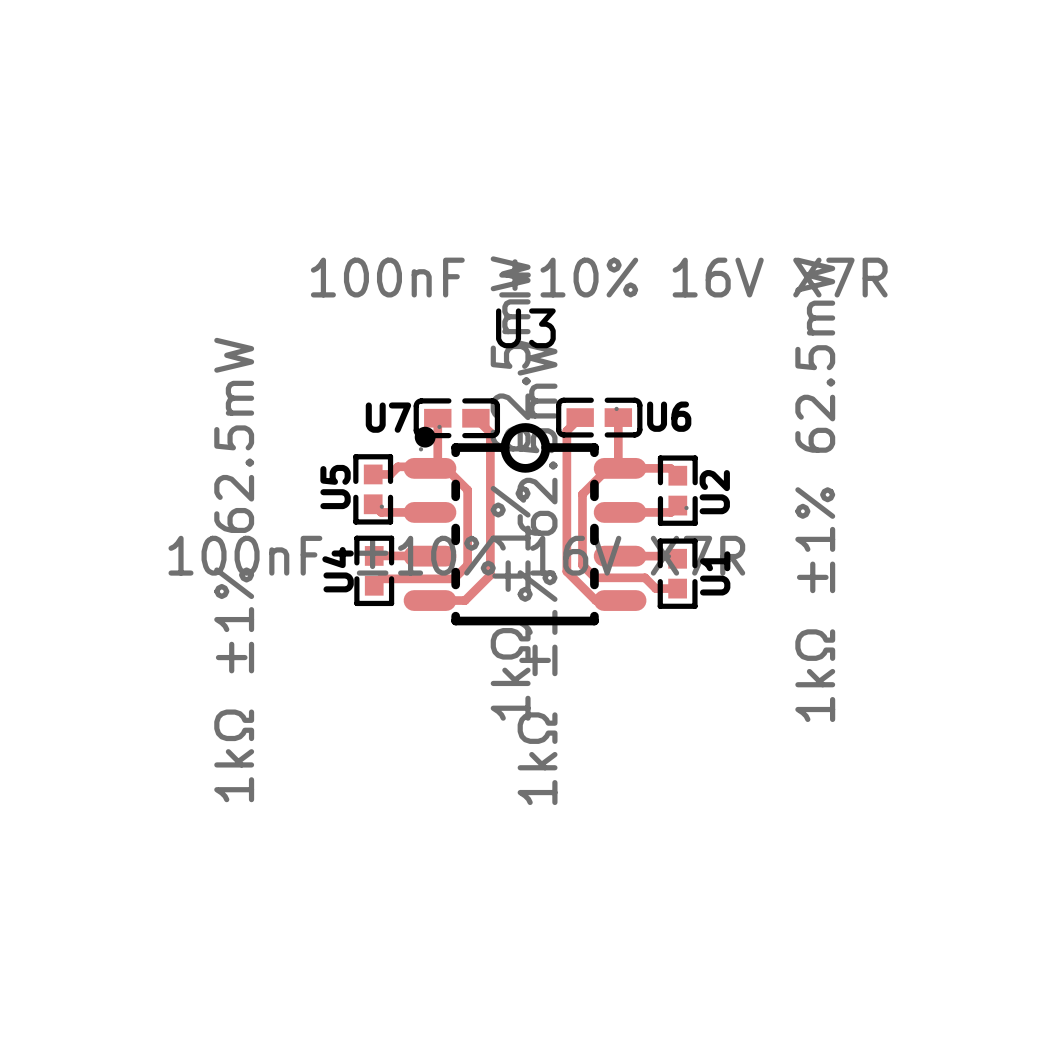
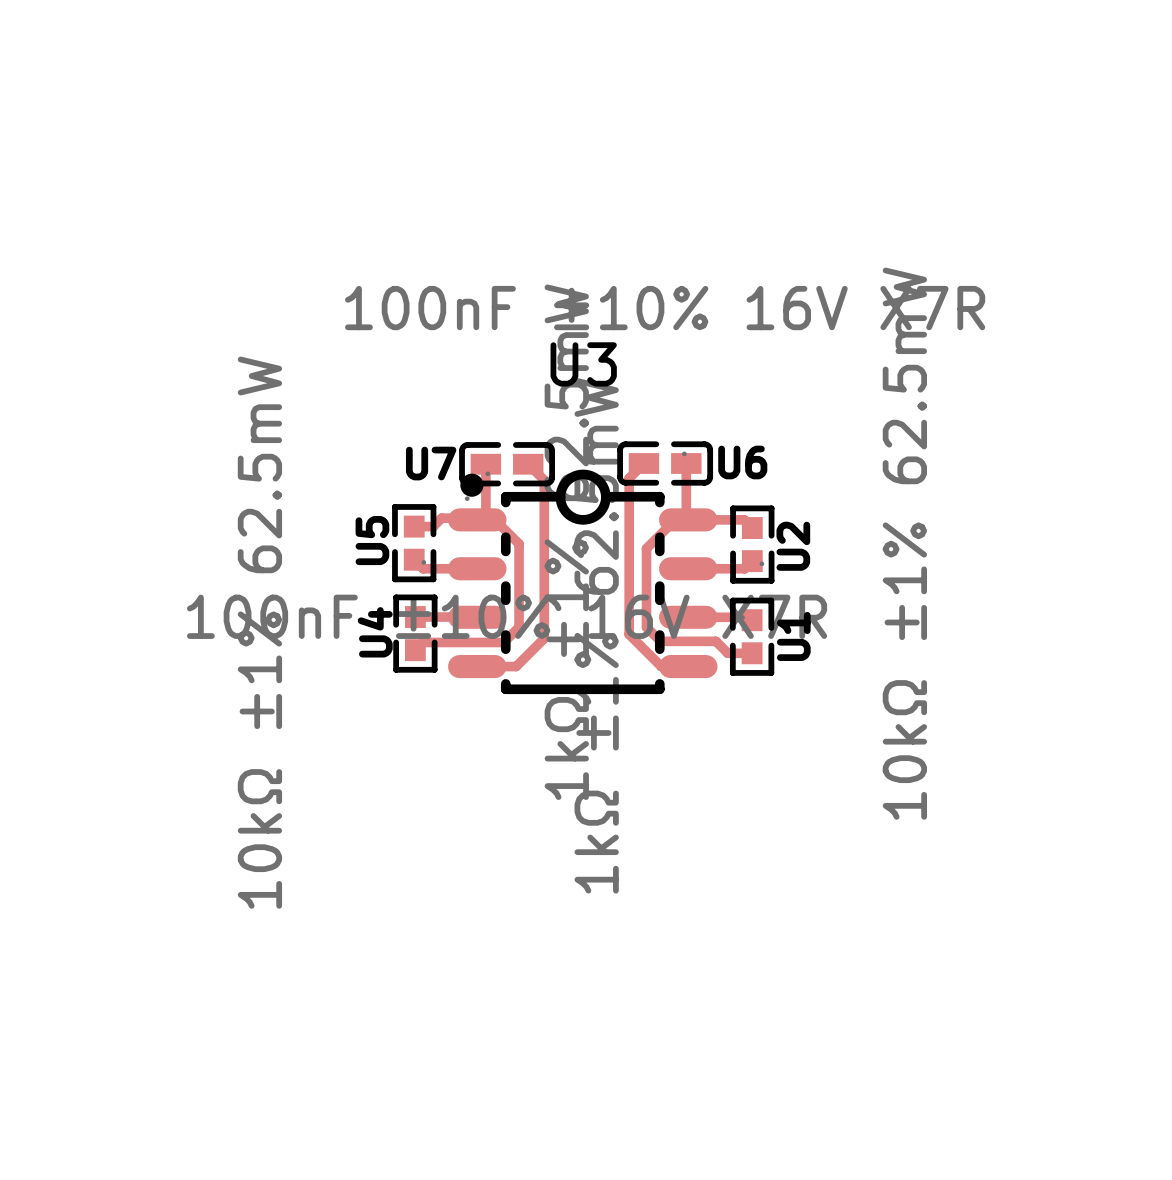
U2 value: 1kΩ ±1% 62.5mW (815, 489) -> 10kΩ ±1% 62.5mW (904, 543)
U4 value: 1kΩ ±1% 62.5mW (234, 570) -> 10kΩ ±1% 62.5mW (259, 632)

